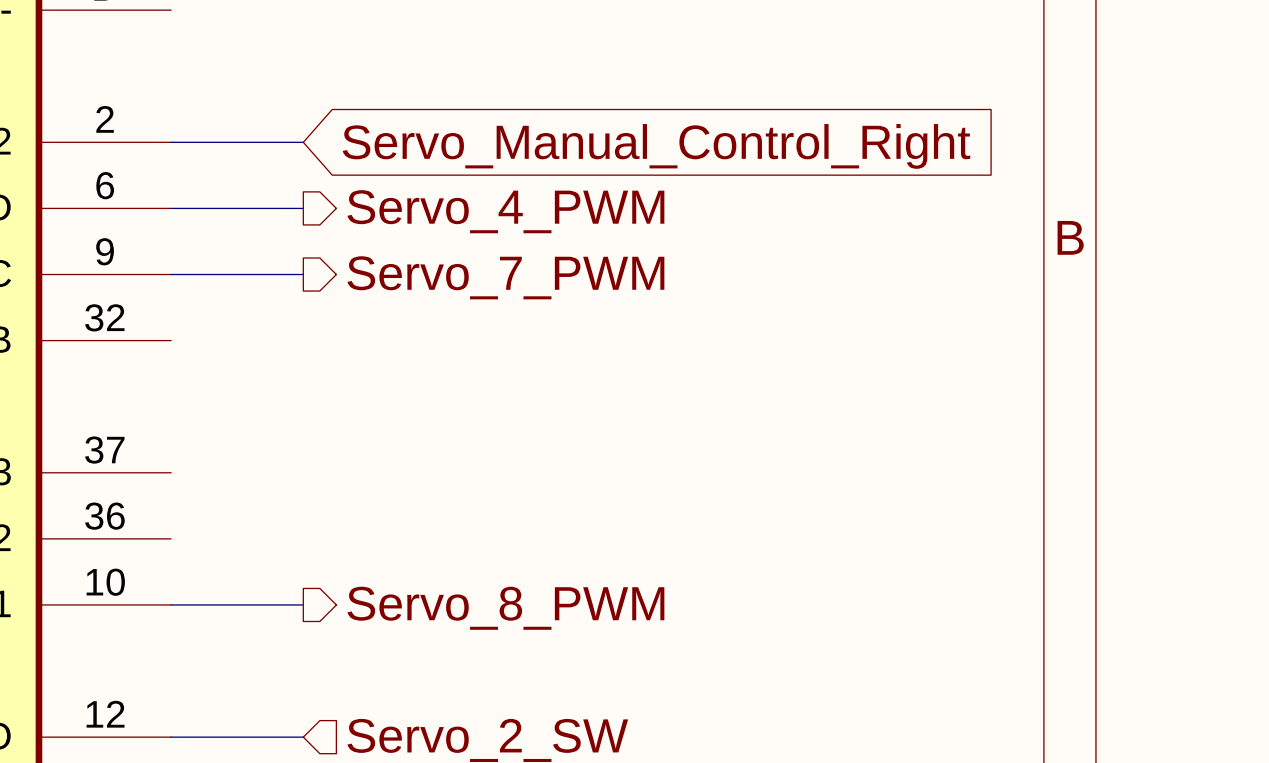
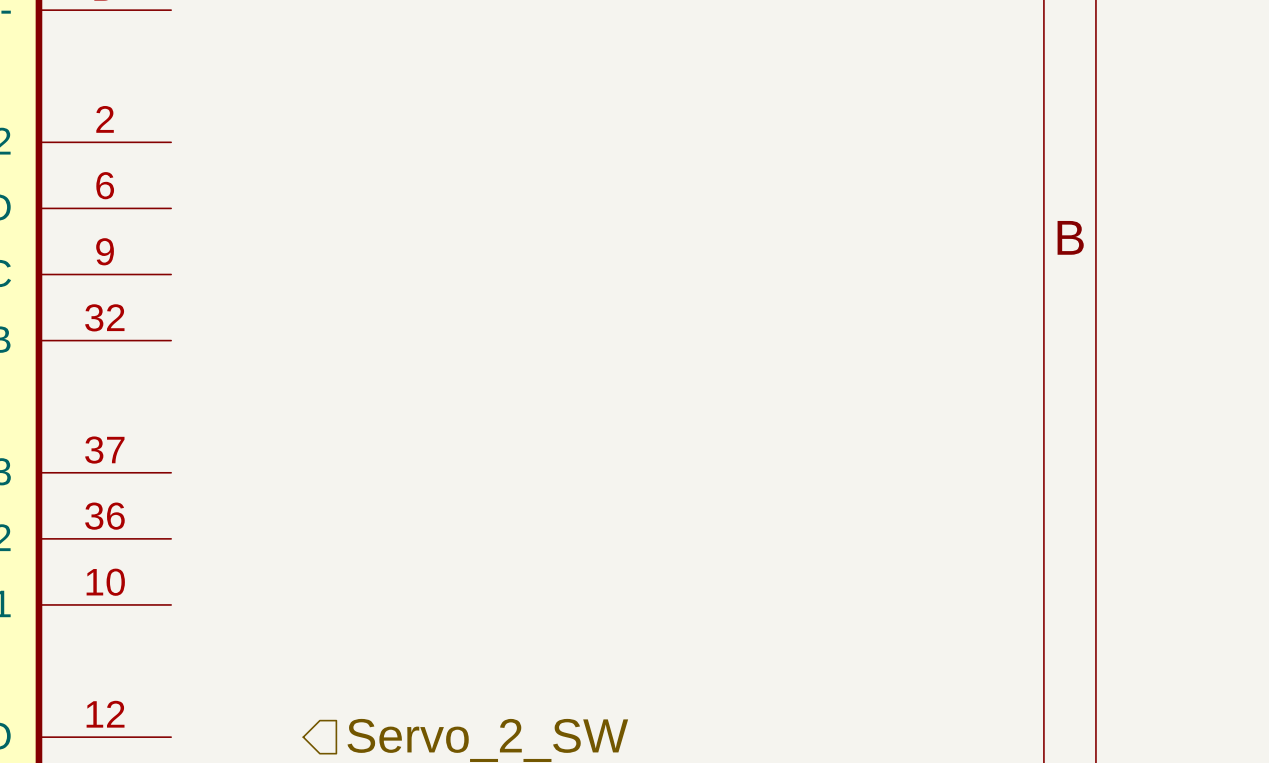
wire: (171, 142) (303, 142) -> none
global label: Servo_Manual_Control_Right (656, 146) -> none
wire: (171, 208) (303, 208) -> none
hierarchical label: Servo_4_PWM (505, 211) -> none
wire: (171, 274) (303, 274) -> none
hierarchical label: Servo_7_PWM (505, 277) -> none
wire: (171, 604) (303, 604) -> none
hierarchical label: Servo_8_PWM (505, 608) -> none
wire: (171, 737) (303, 737) -> none

